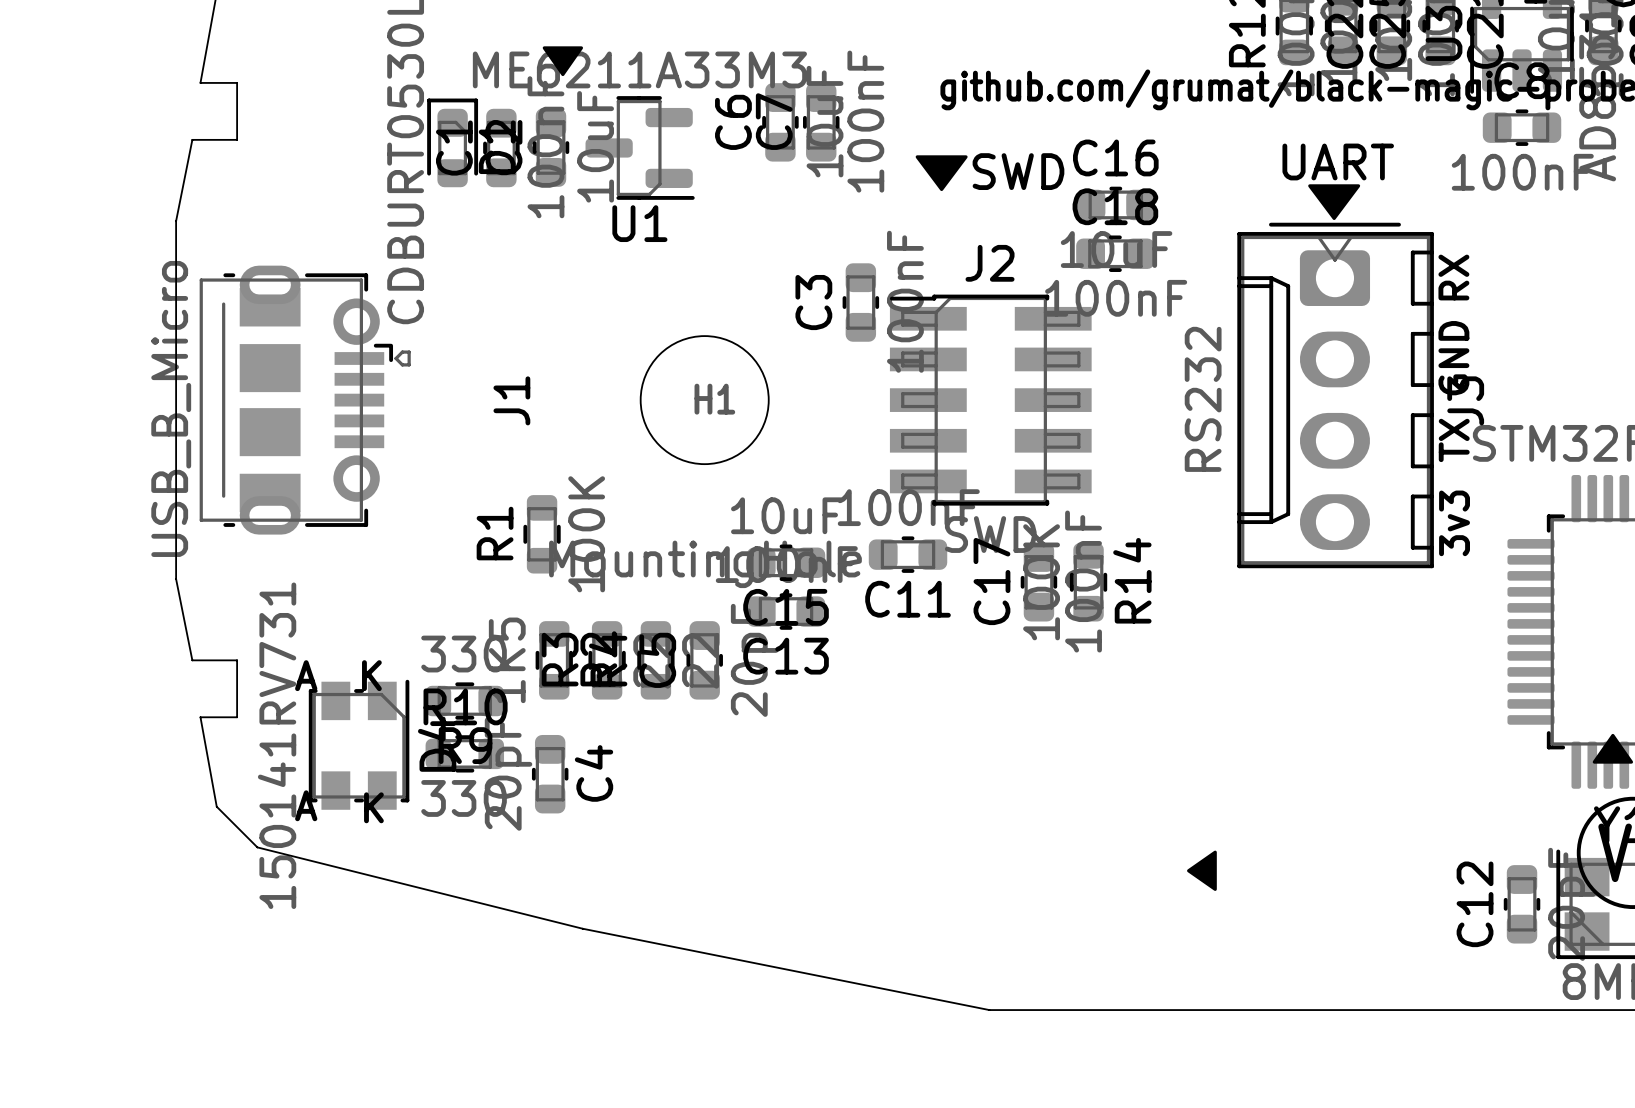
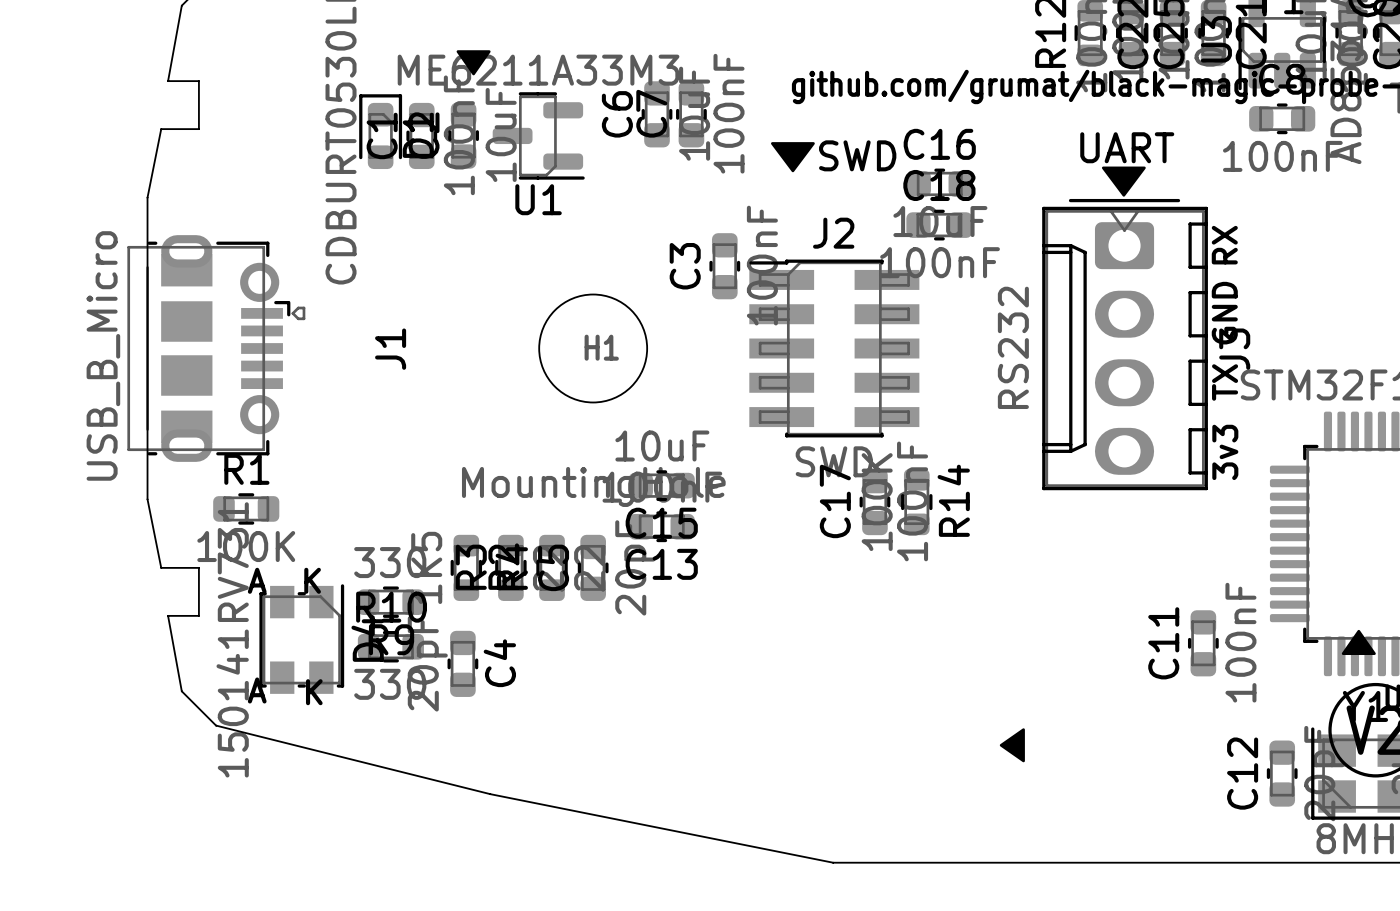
J1 position: (305, 400) -> (216, 348)
R1 rotation: 0° (542, 534) -> 90° clockwise (246, 508)
R1 position: (542, 534) -> (246, 508)
C11 rotation: 0° (908, 554) -> 90° clockwise (1203, 643)
C11 position: (908, 554) -> (1203, 643)

